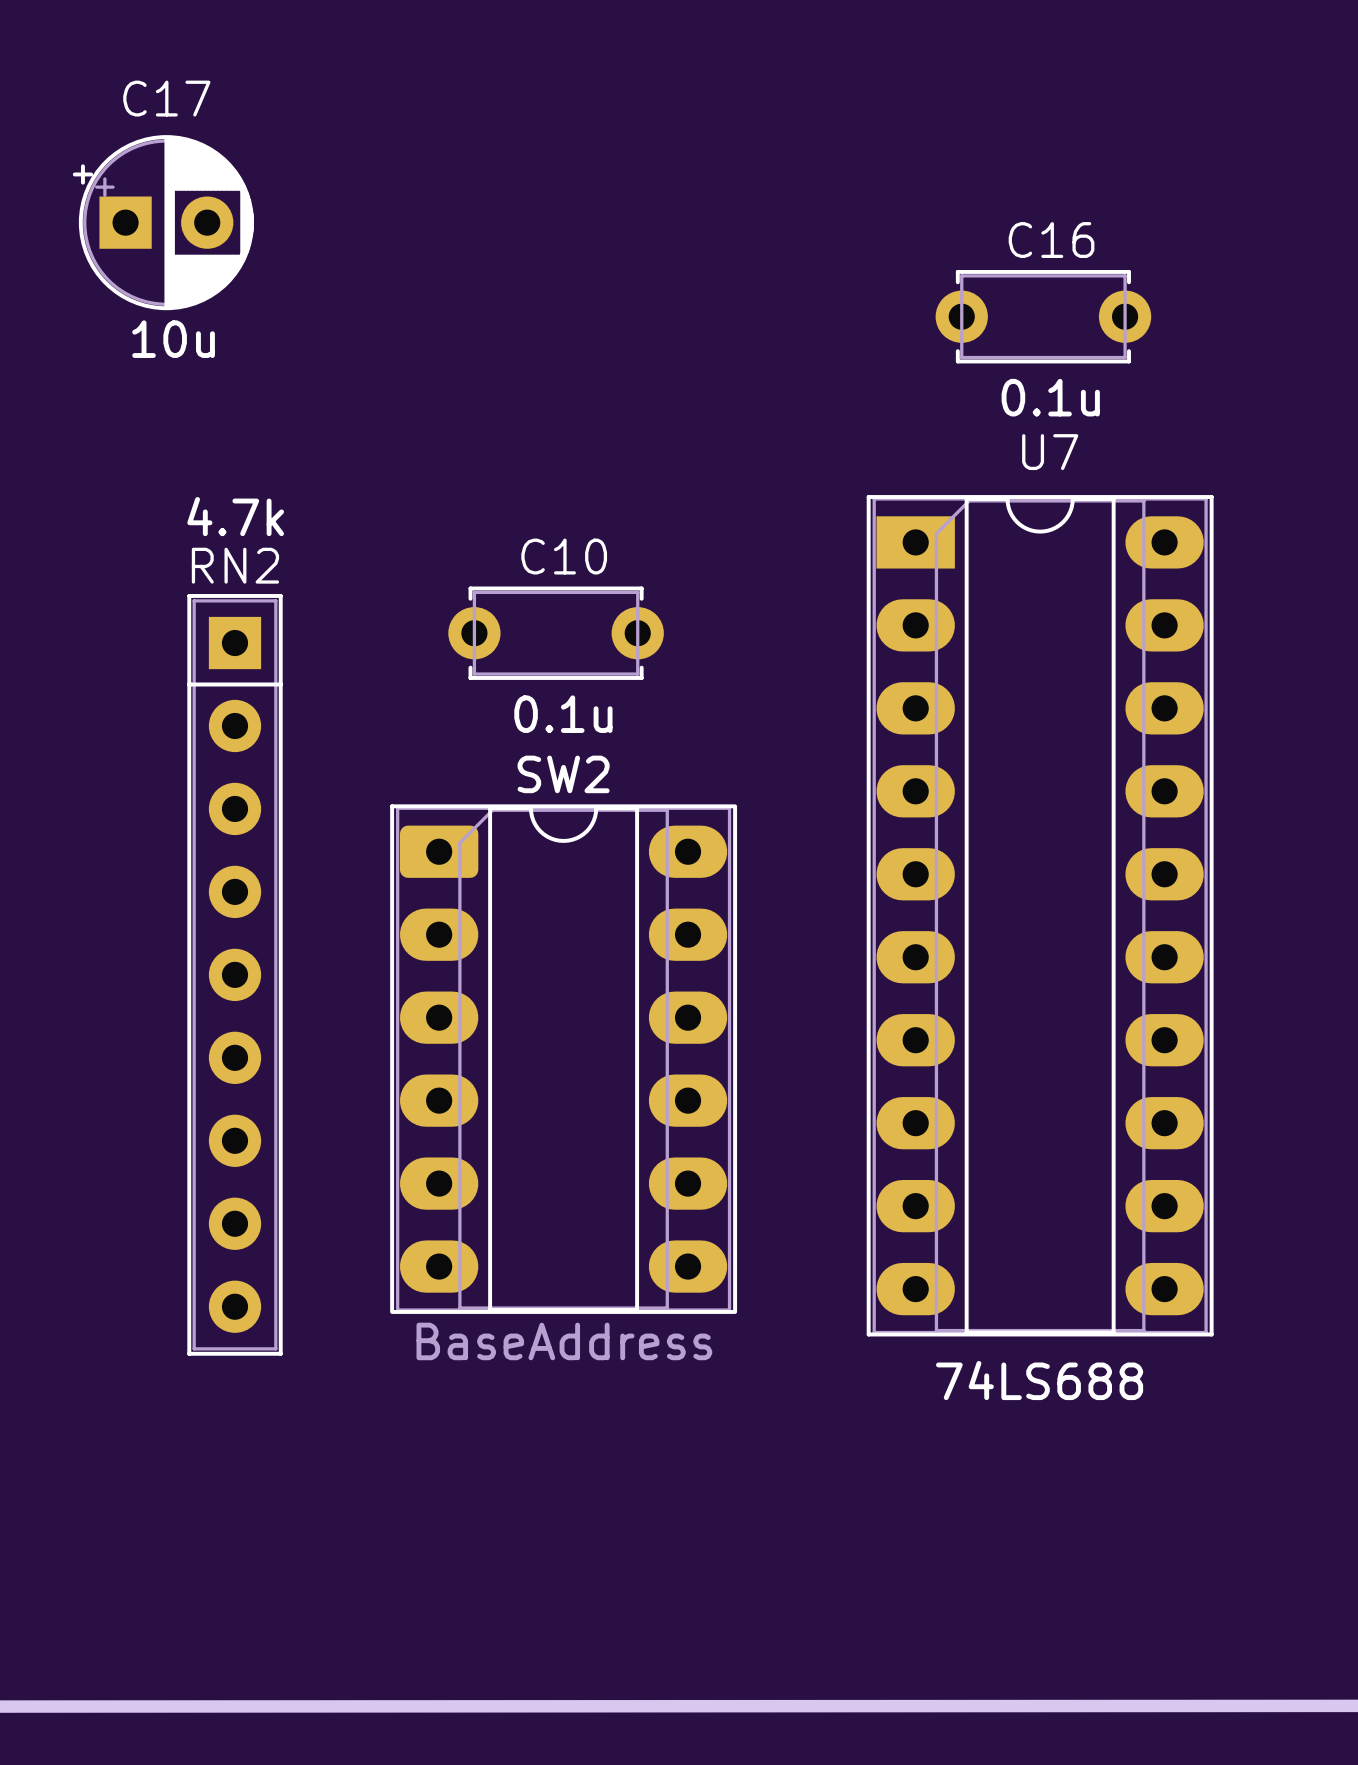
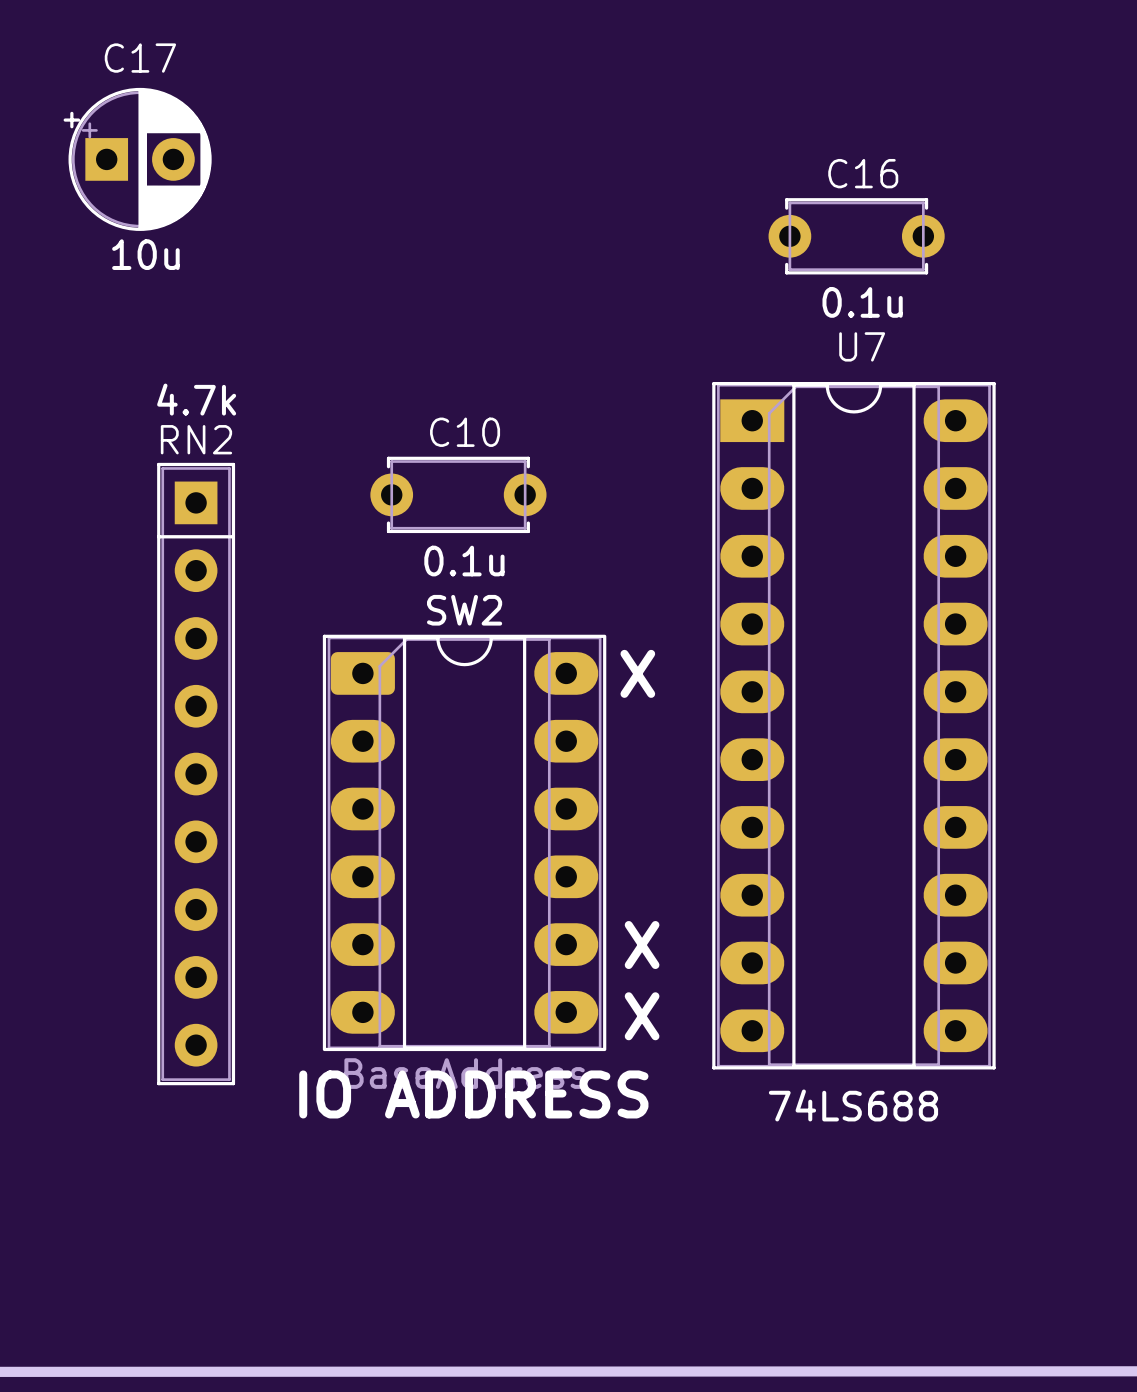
text: none -> X (637, 673)
text: none -> X (642, 945)
text: none -> X (642, 1016)
text: none -> IO ADDRESS (473, 1094)

